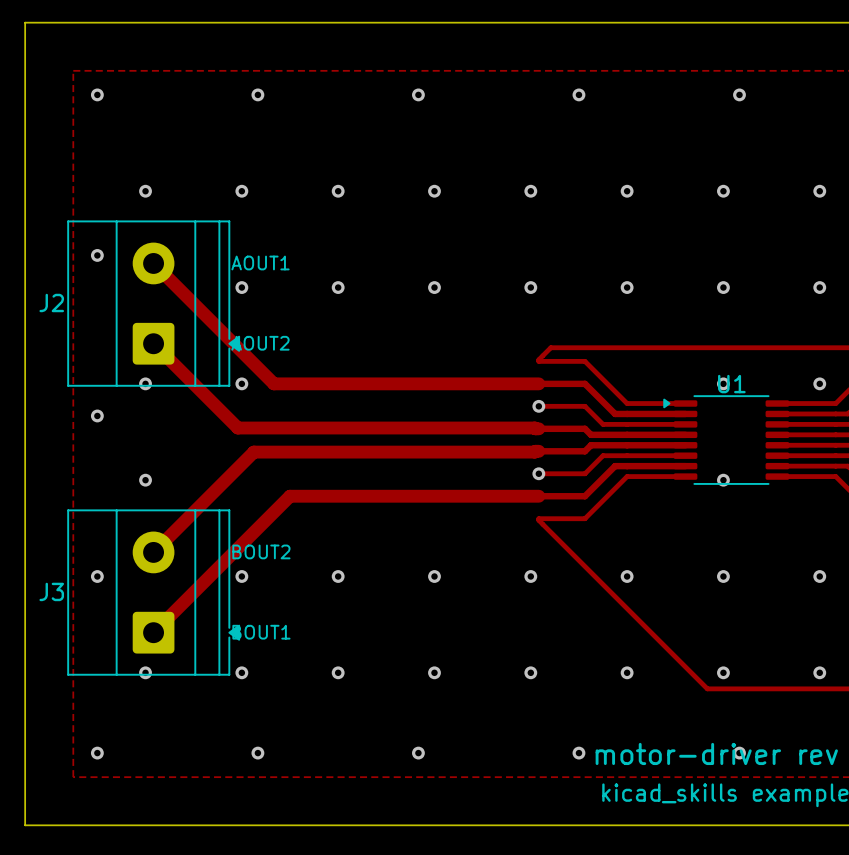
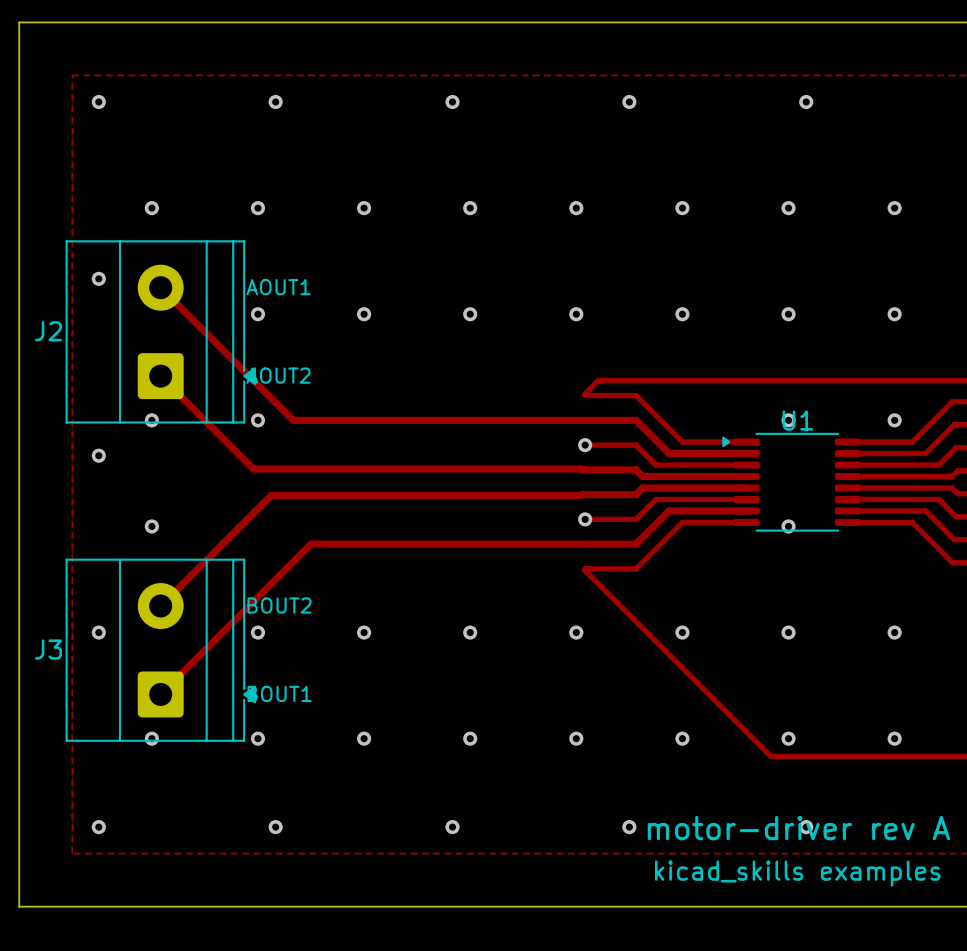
track width: thick (153, 263) (273, 383) (538, 383) -> thin (160, 287) (293, 420) (585, 420)
track width: thick (153, 343) (237, 428) (538, 428) -> thin (160, 376) (253, 468) (585, 469)
track width: thick (538, 451) (253, 452) (153, 552) -> thin (585, 494) (271, 495) (160, 606)
track width: thick (538, 496) (290, 496) (153, 632) -> thin (585, 544) (311, 544) (160, 694)

